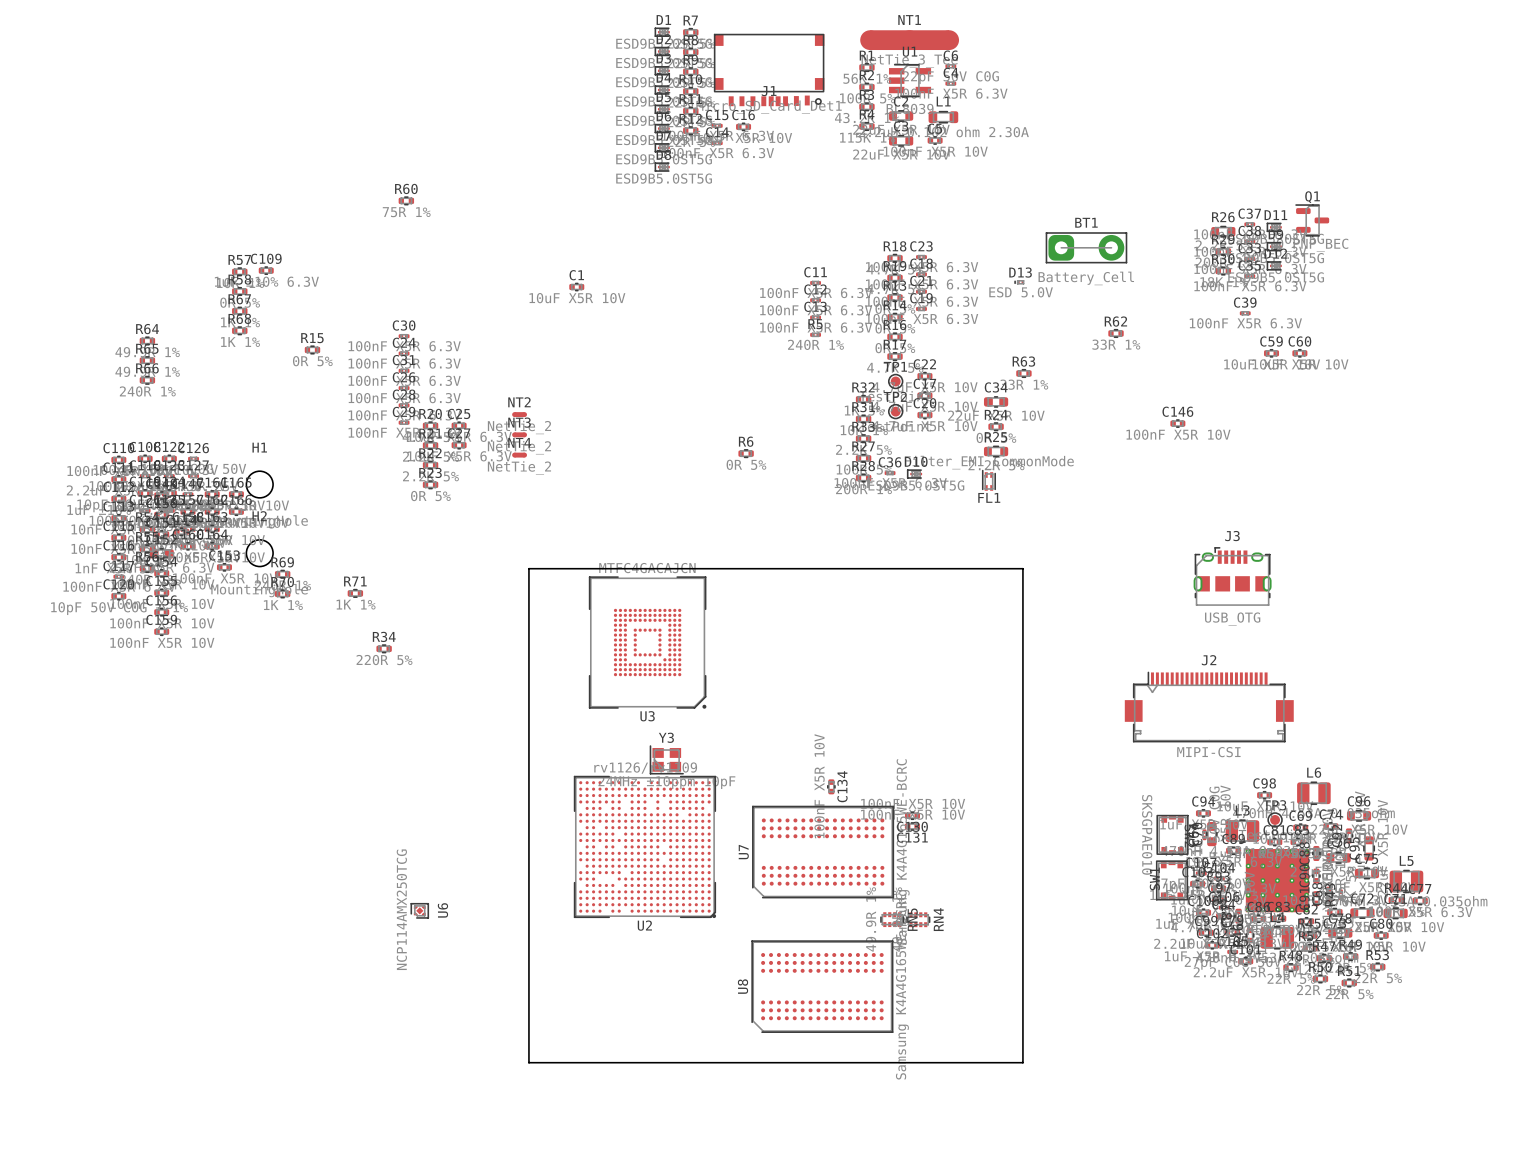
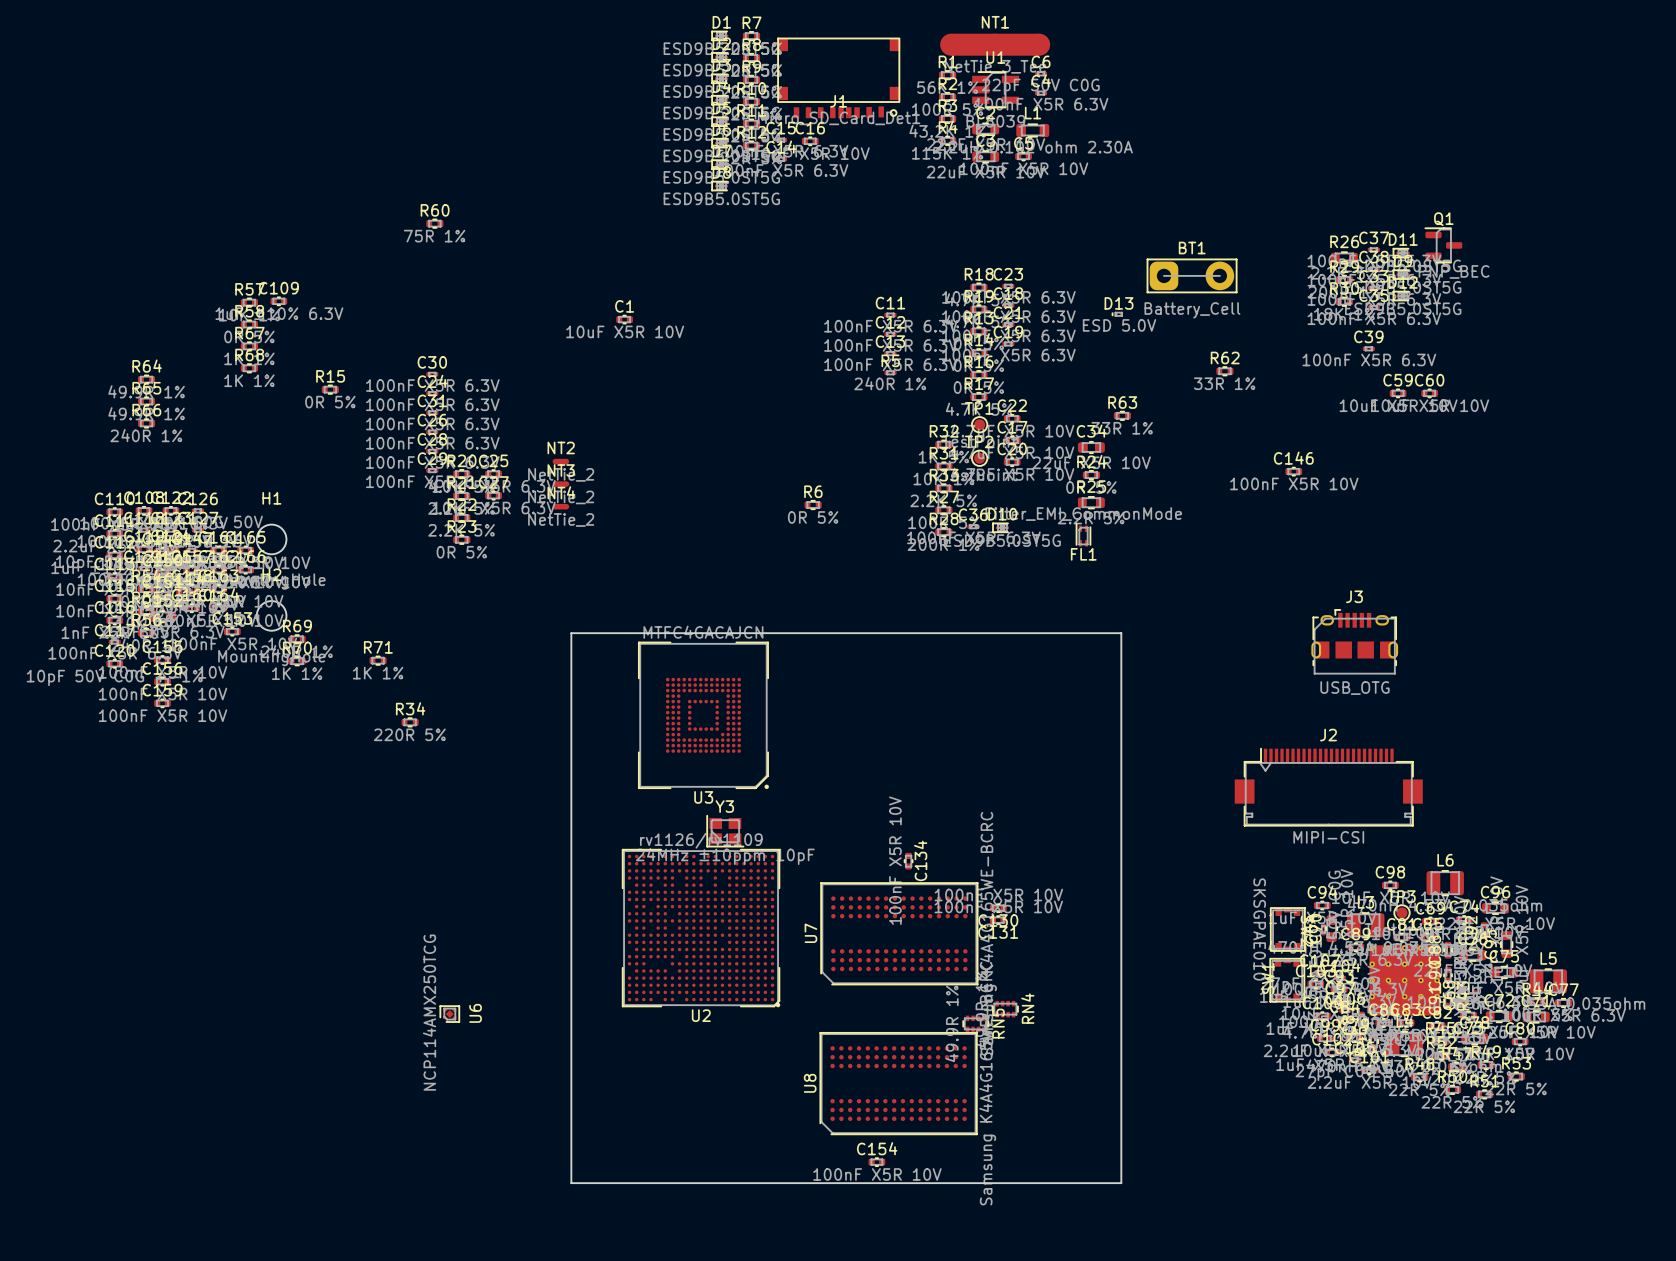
C154 position: (161, 573) -> (876, 1162)
Y3 position: (666, 759) -> (725, 831)
C134 position: (831, 786) -> (908, 861)
U2 position: (645, 847) -> (701, 928)
U7 position: (823, 852) -> (899, 933)
RN4 position: (918, 919) -> (1005, 1009)
U8 position: (822, 986) -> (898, 1083)

